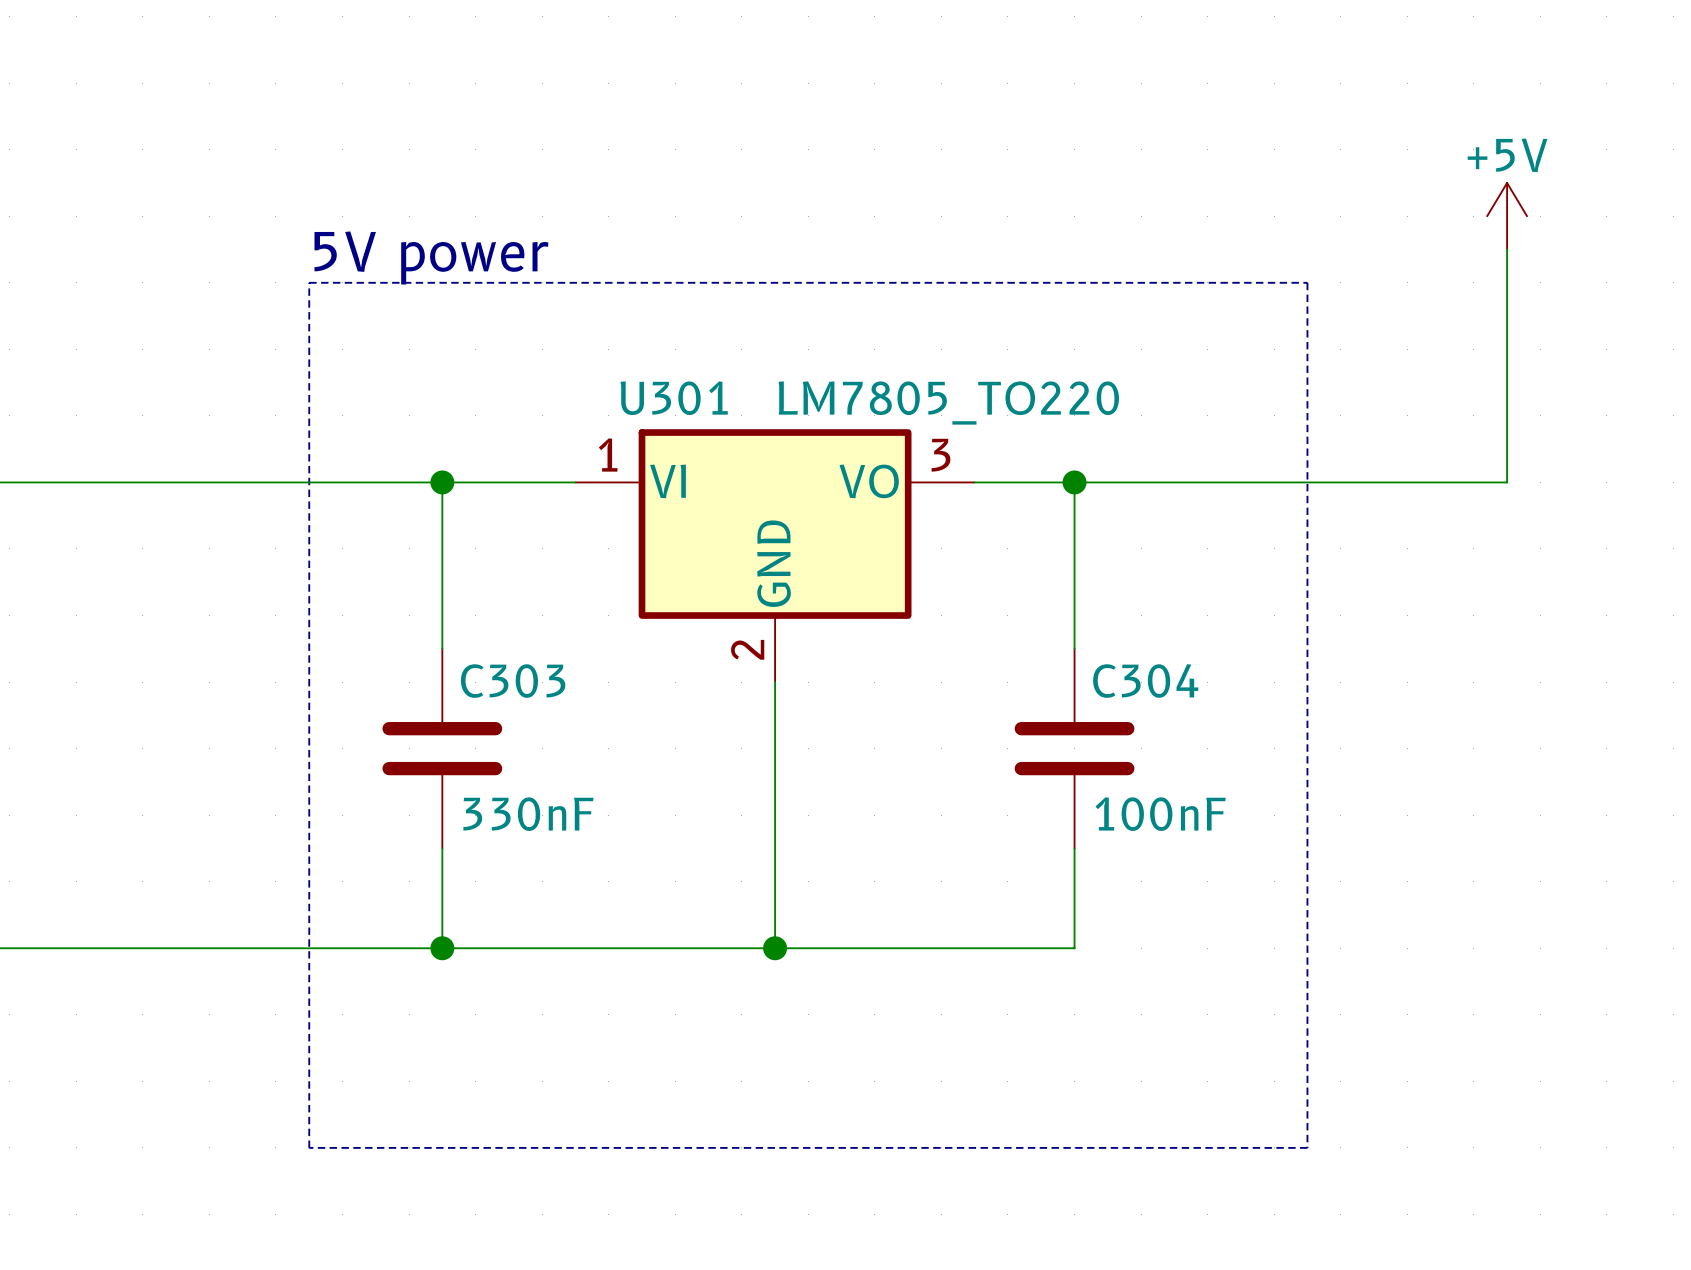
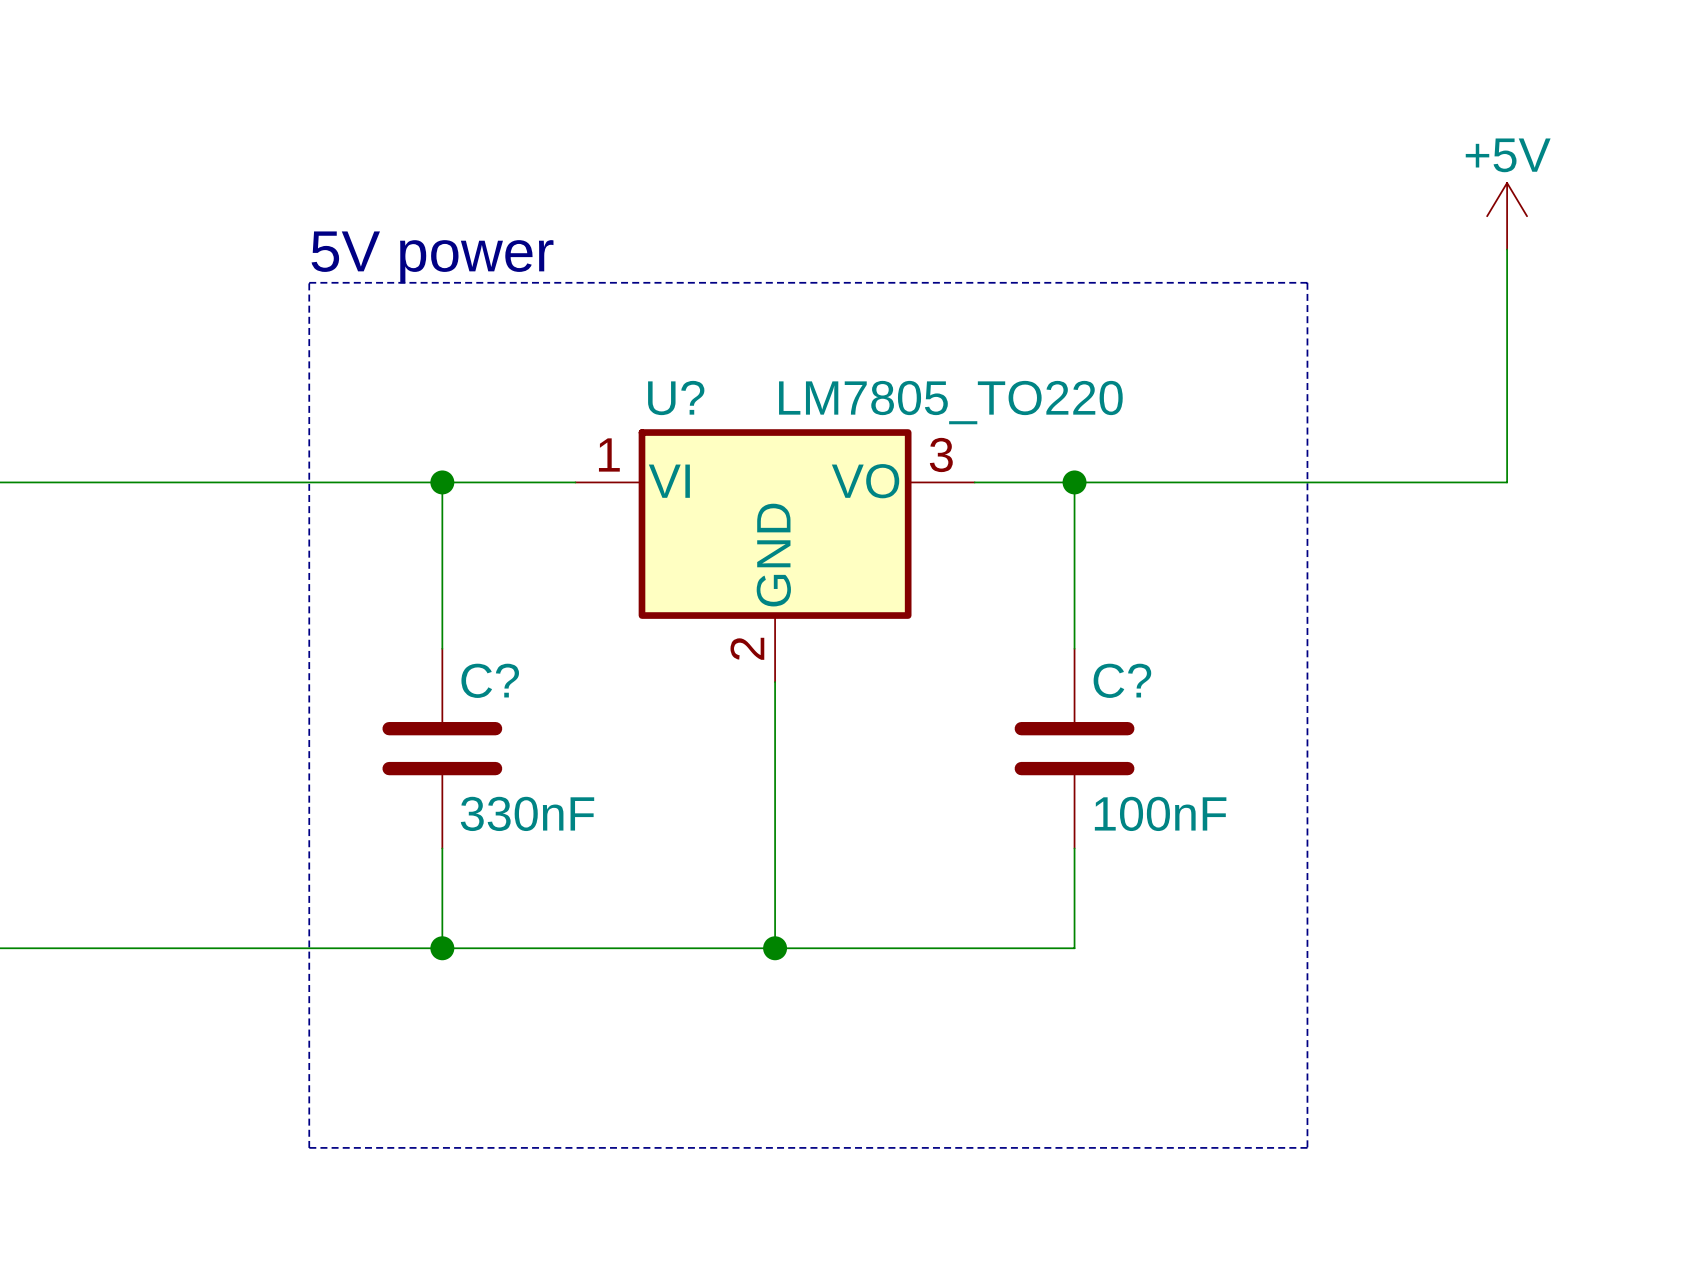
U301 name: U301 (674, 398) -> U? (676, 398)
C303 name: C303 (513, 681) -> C? (490, 680)
C304 name: C304 (1145, 681) -> C? (1122, 680)

